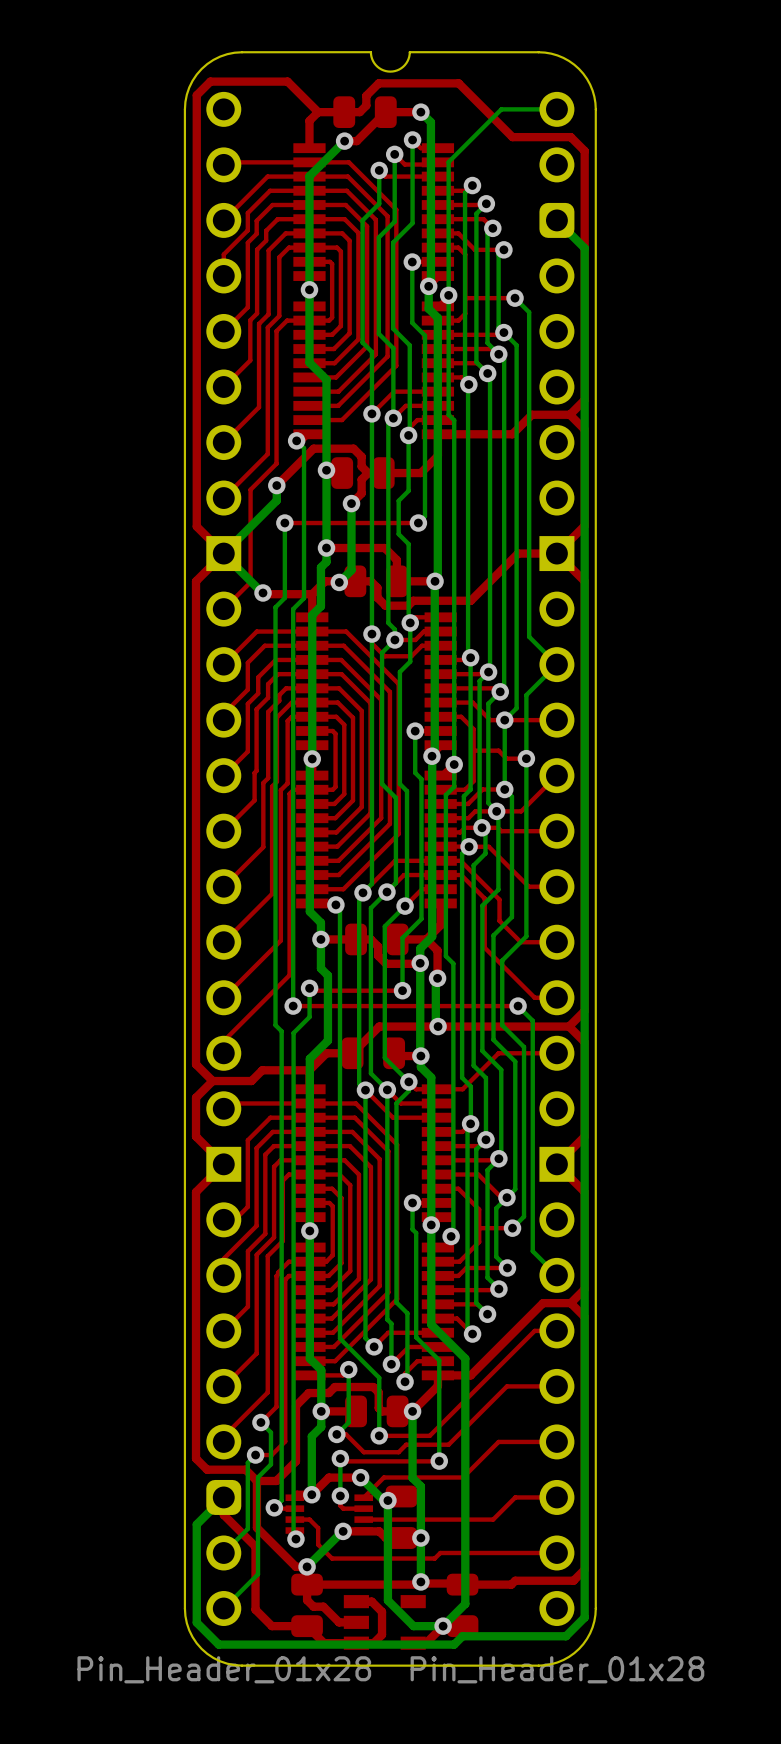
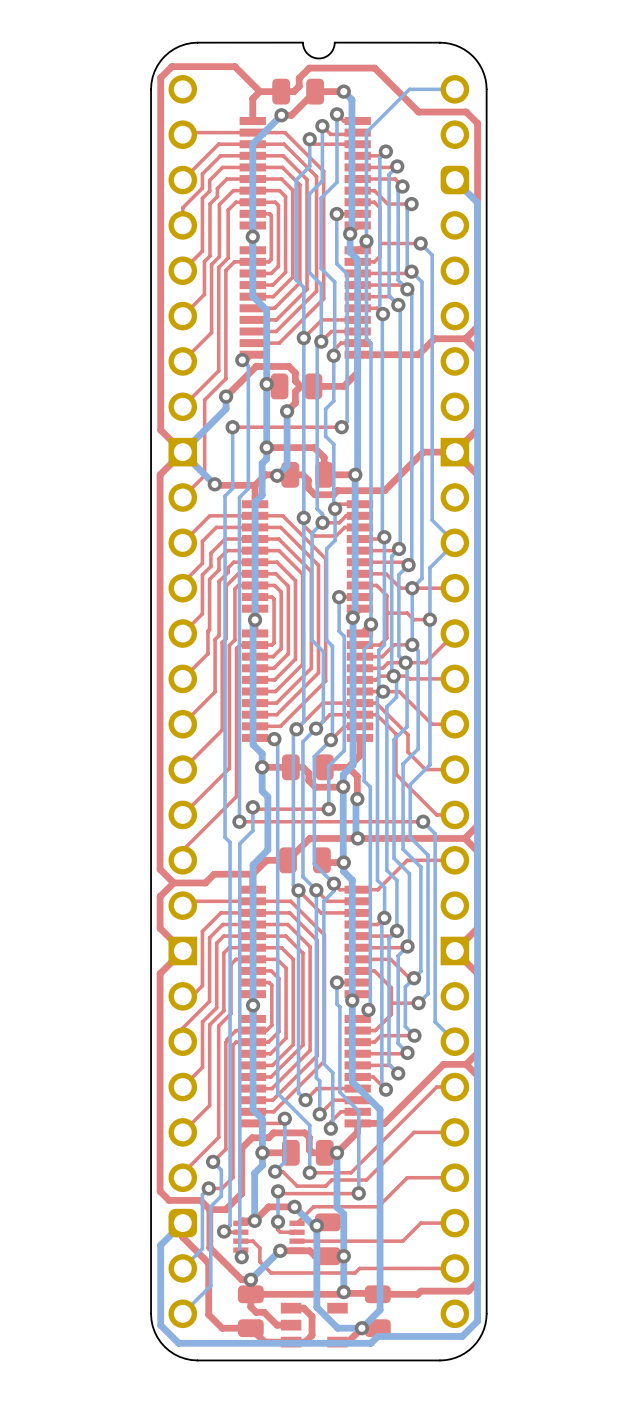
drawing: [77, 1656, 705, 1684] -> none

